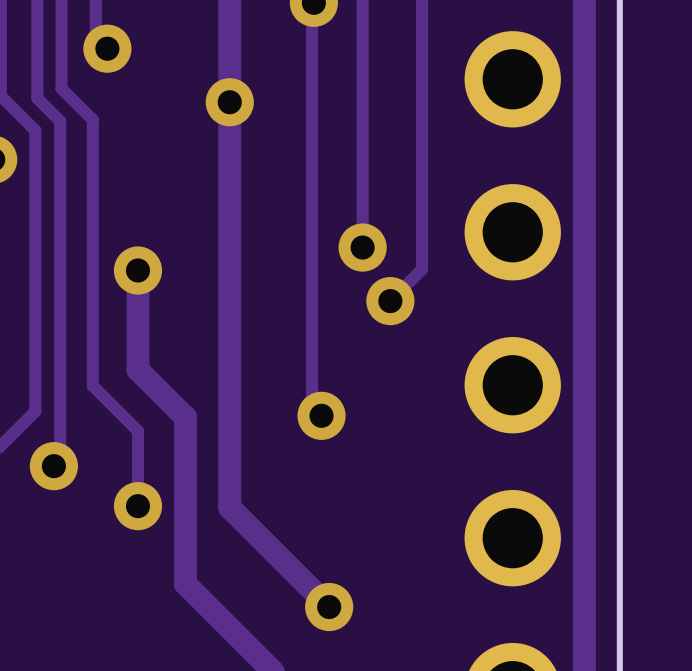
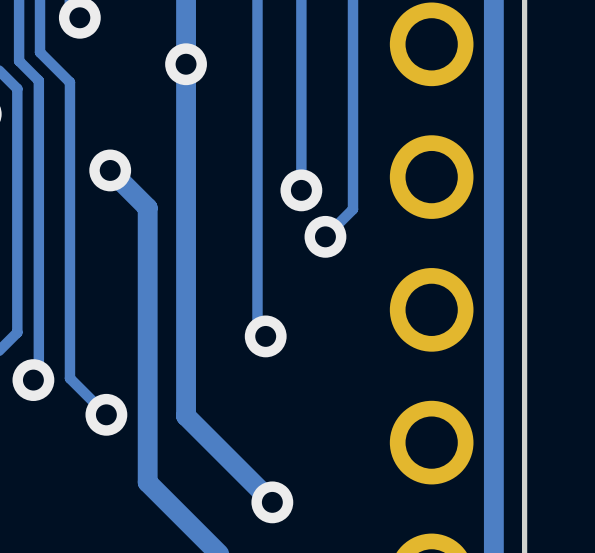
track: (92, 119) (92, 385) (137, 431) (137, 506) -> (67, 79) (69, 82) (69, 378) (106, 414)
track: (137, 270) (137, 369) (185, 417) -> (110, 170) (147, 207) (147, 337)
via position: (137, 270) -> (110, 170)

